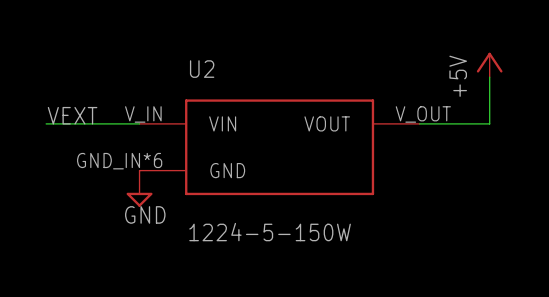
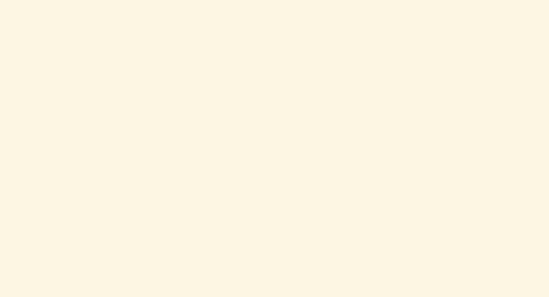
power symbol: +5V (489, 64) -> none
wire: (489, 77) (489, 123) (419, 123) -> none
label: VEXT (72, 115) -> none
wire: (46, 123) (139, 123) -> none
U2: 1224-5-150W (279, 147) -> none
power symbol: GND (139, 188) -> none

